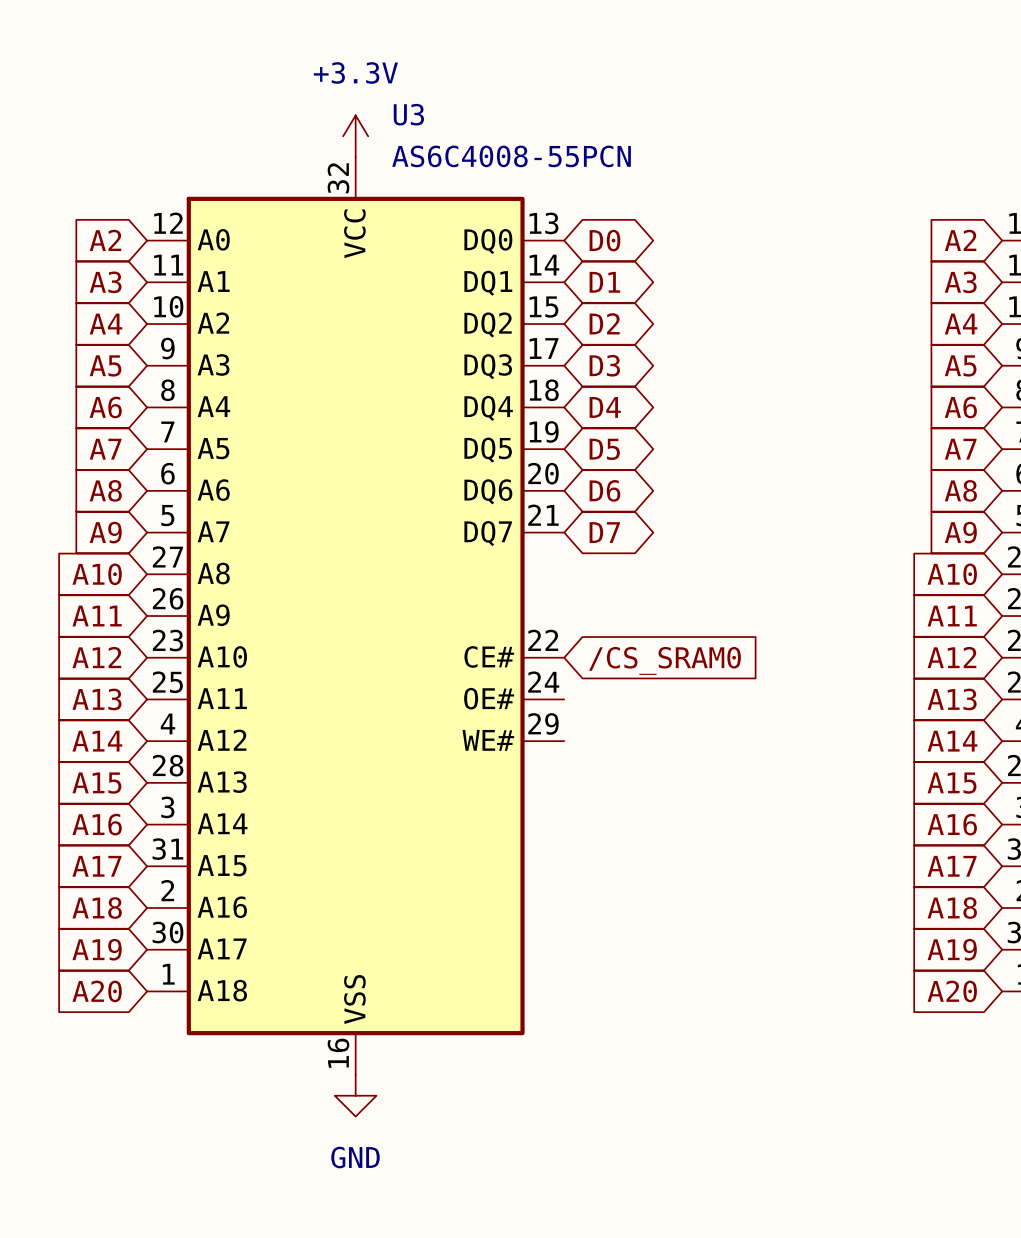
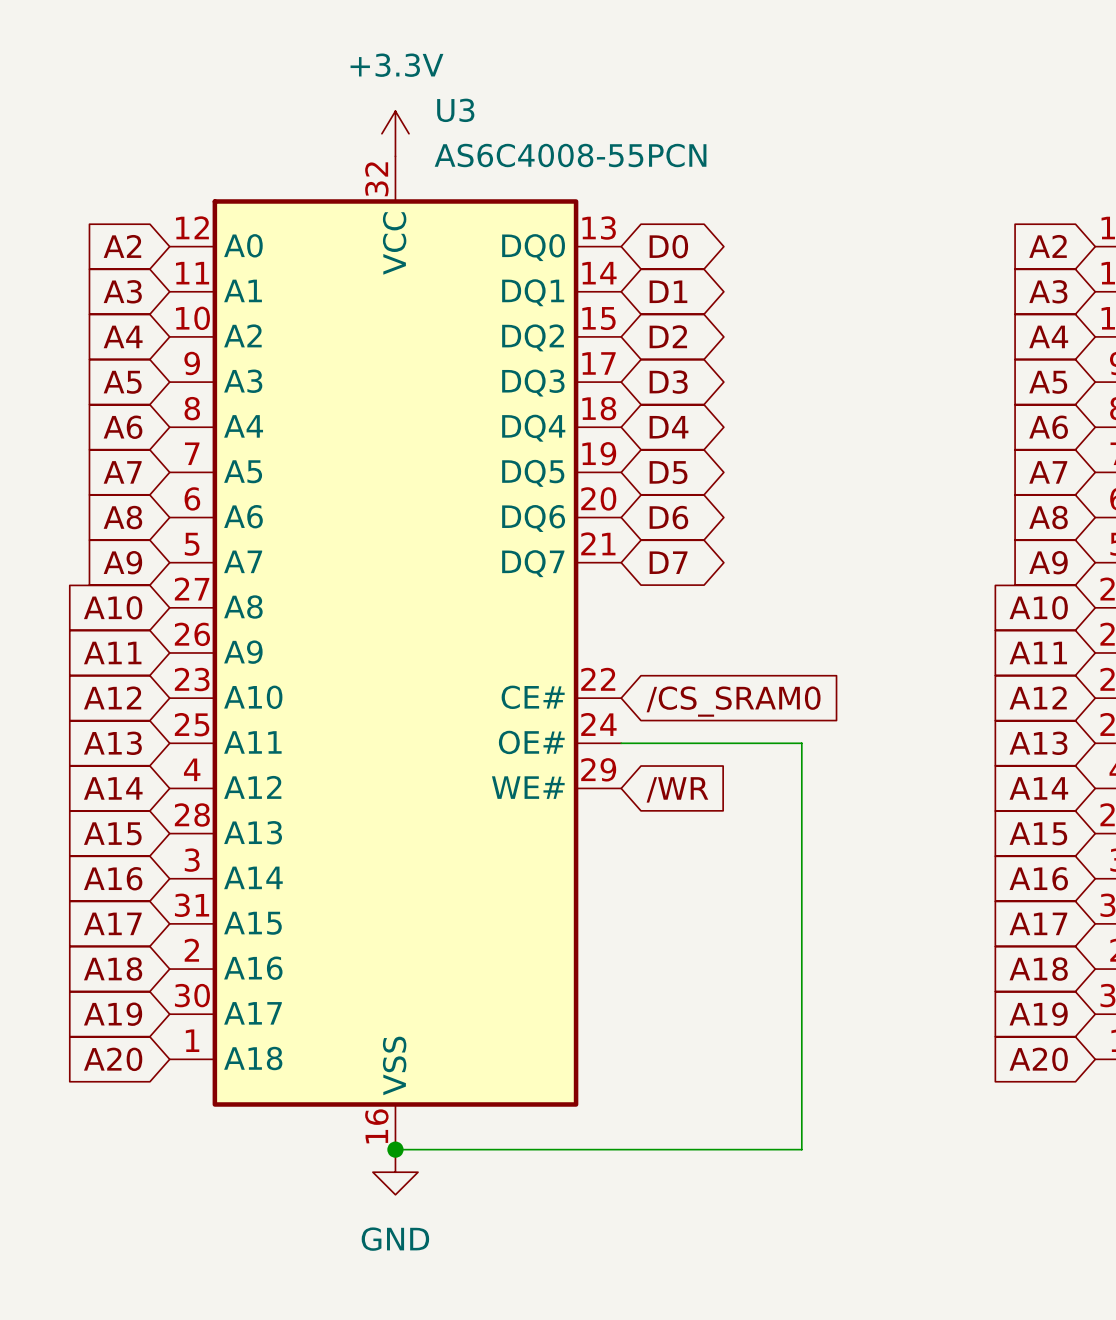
wire: none -> (621, 743) (801, 743) (801, 1149) (395, 1149)
global label: none -> /WR (677, 789)
junction: none -> (395, 1149)

